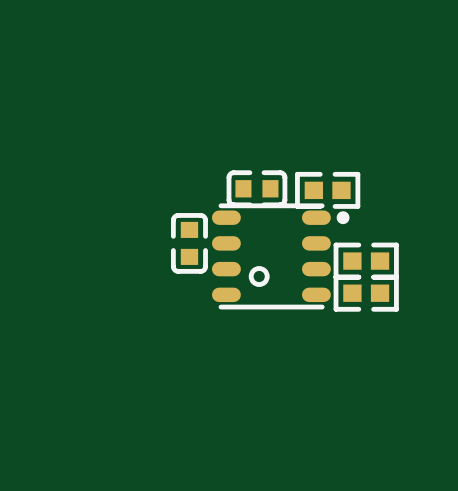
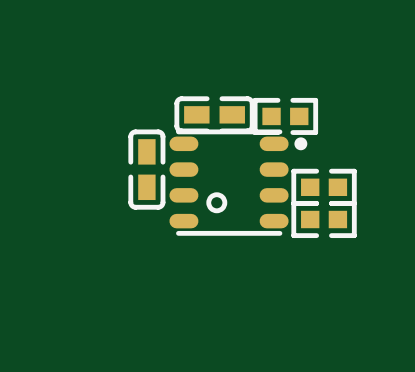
part footprint: [226, 170, 288, 208] -> [174, 96, 255, 134]
part footprint: [170, 213, 208, 274] -> [128, 129, 166, 210]

